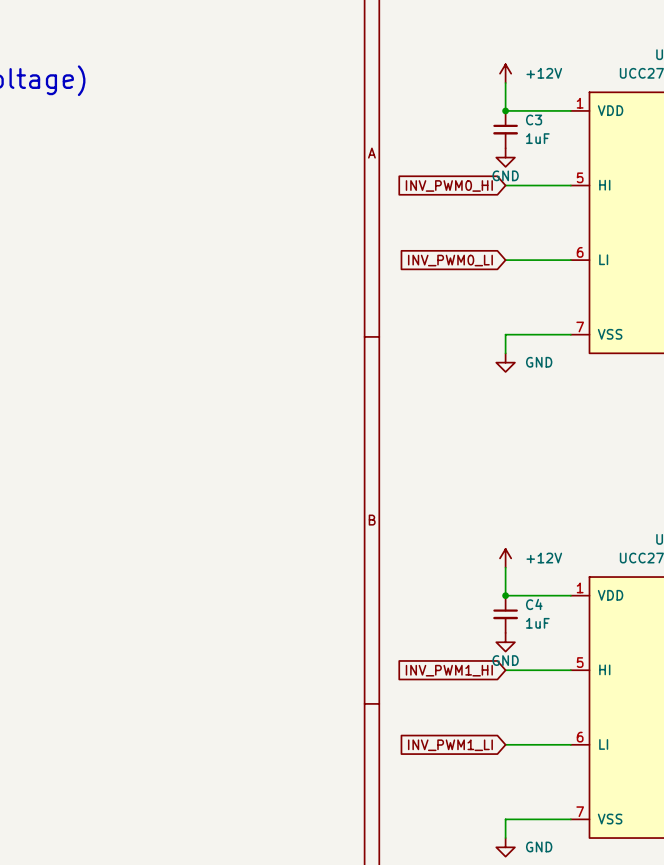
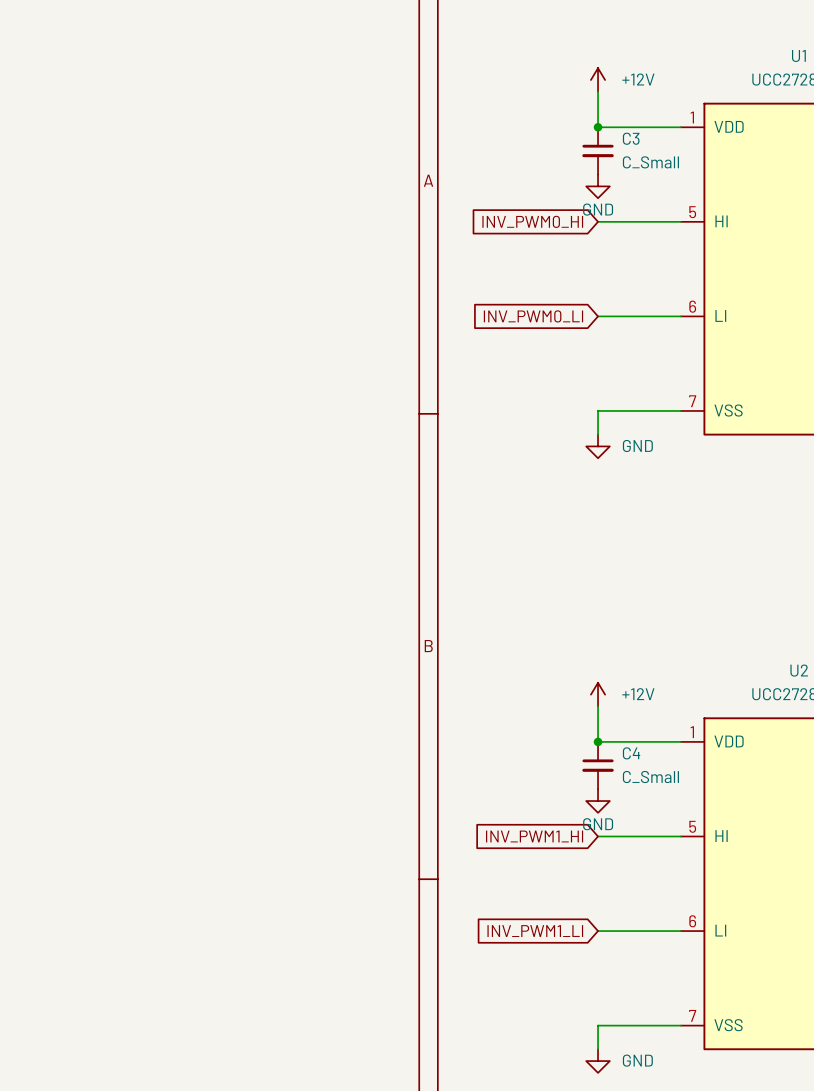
C3 value: 1uF (537, 138) -> C_Small (650, 162)
C4 value: 1uF (537, 623) -> C_Small (650, 777)

